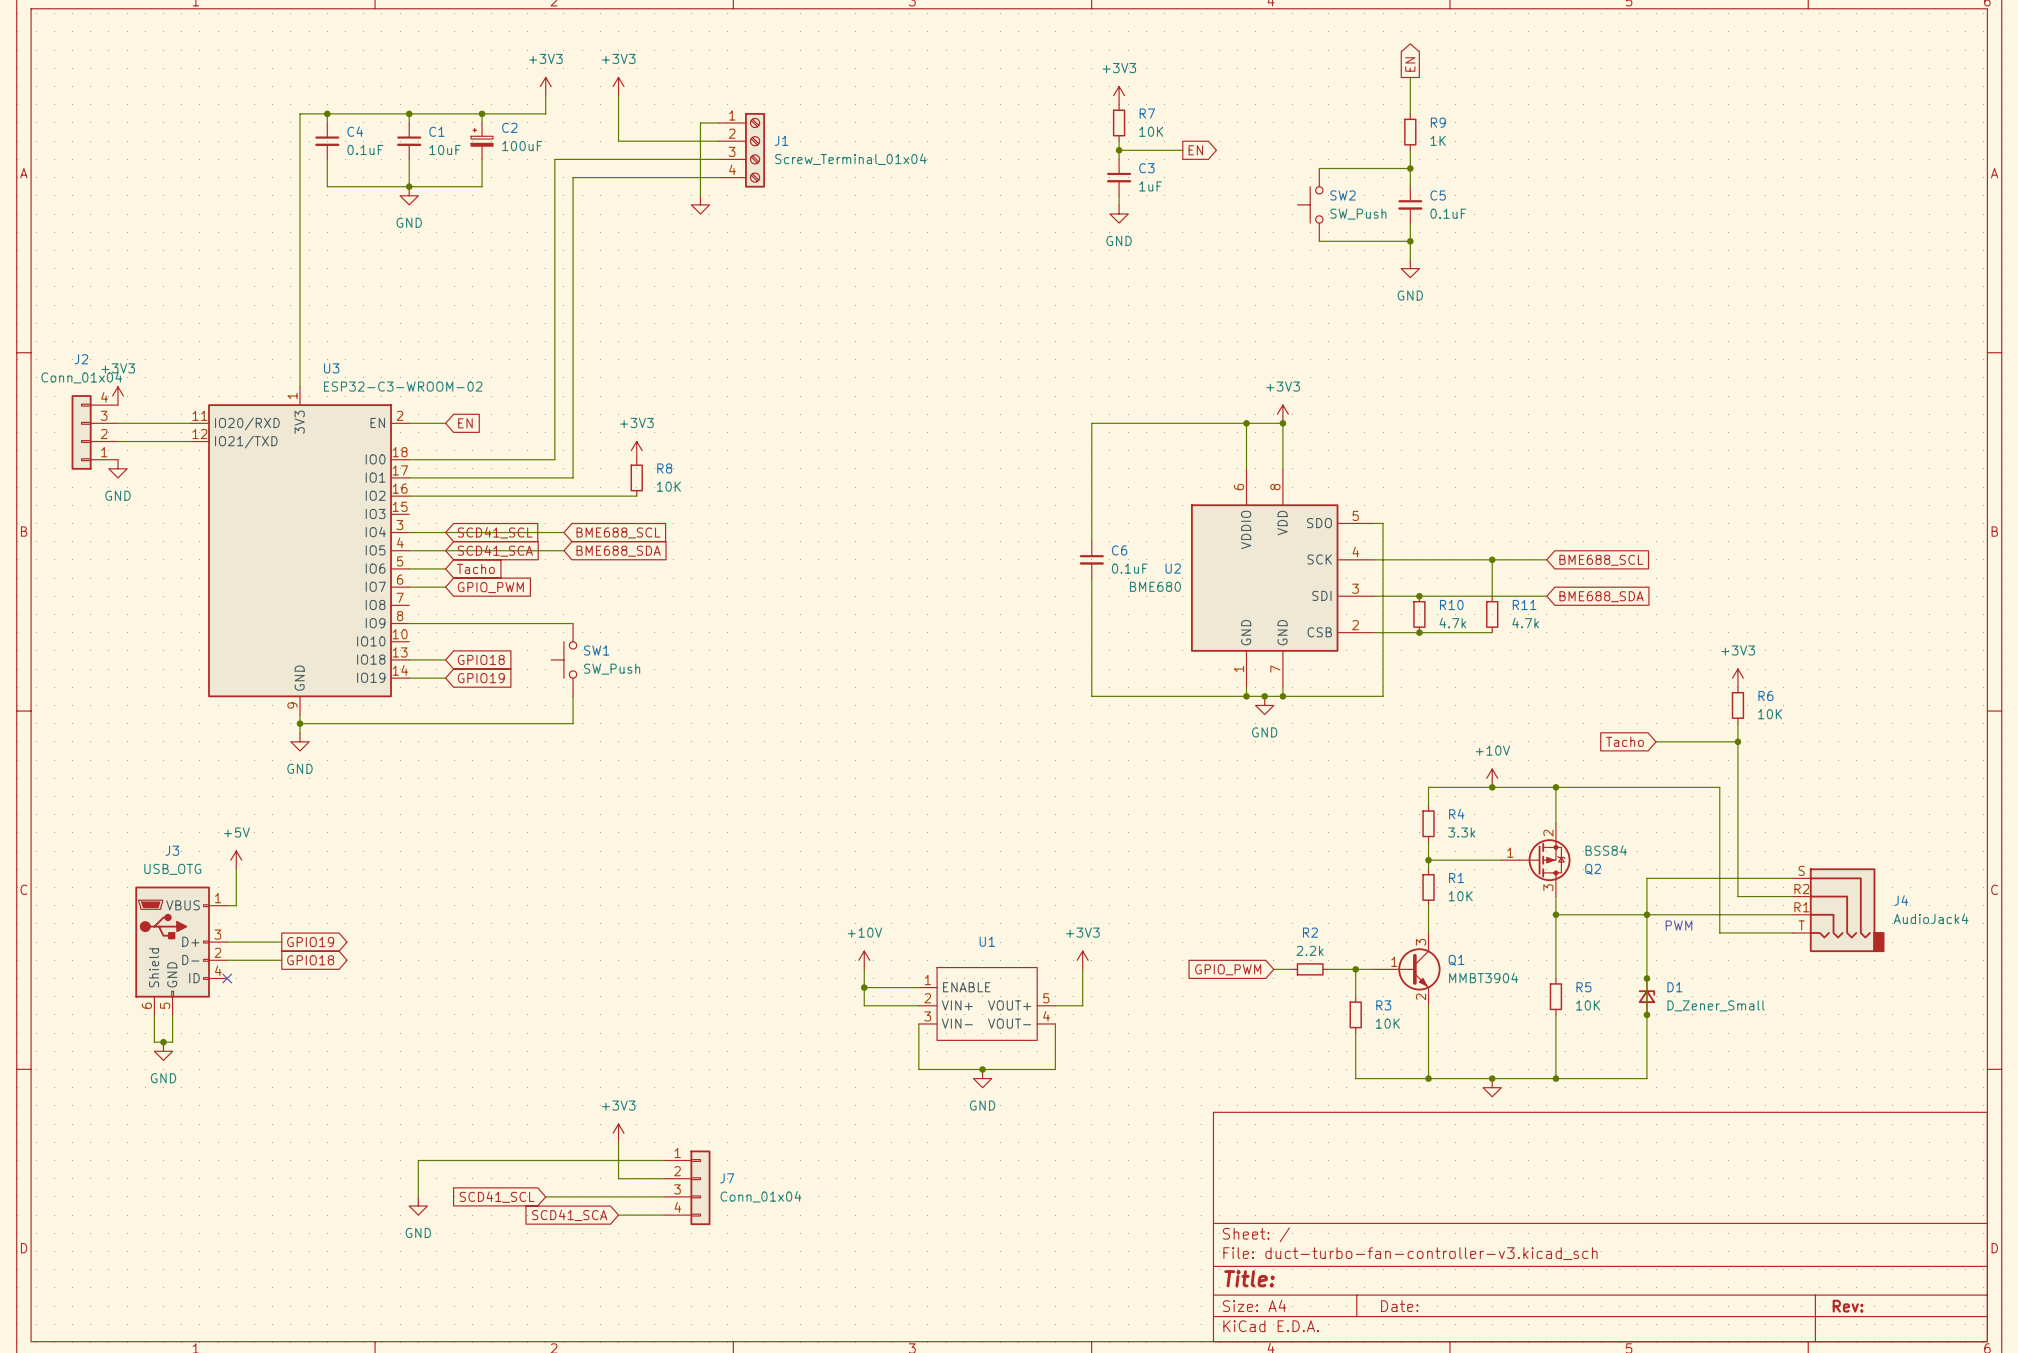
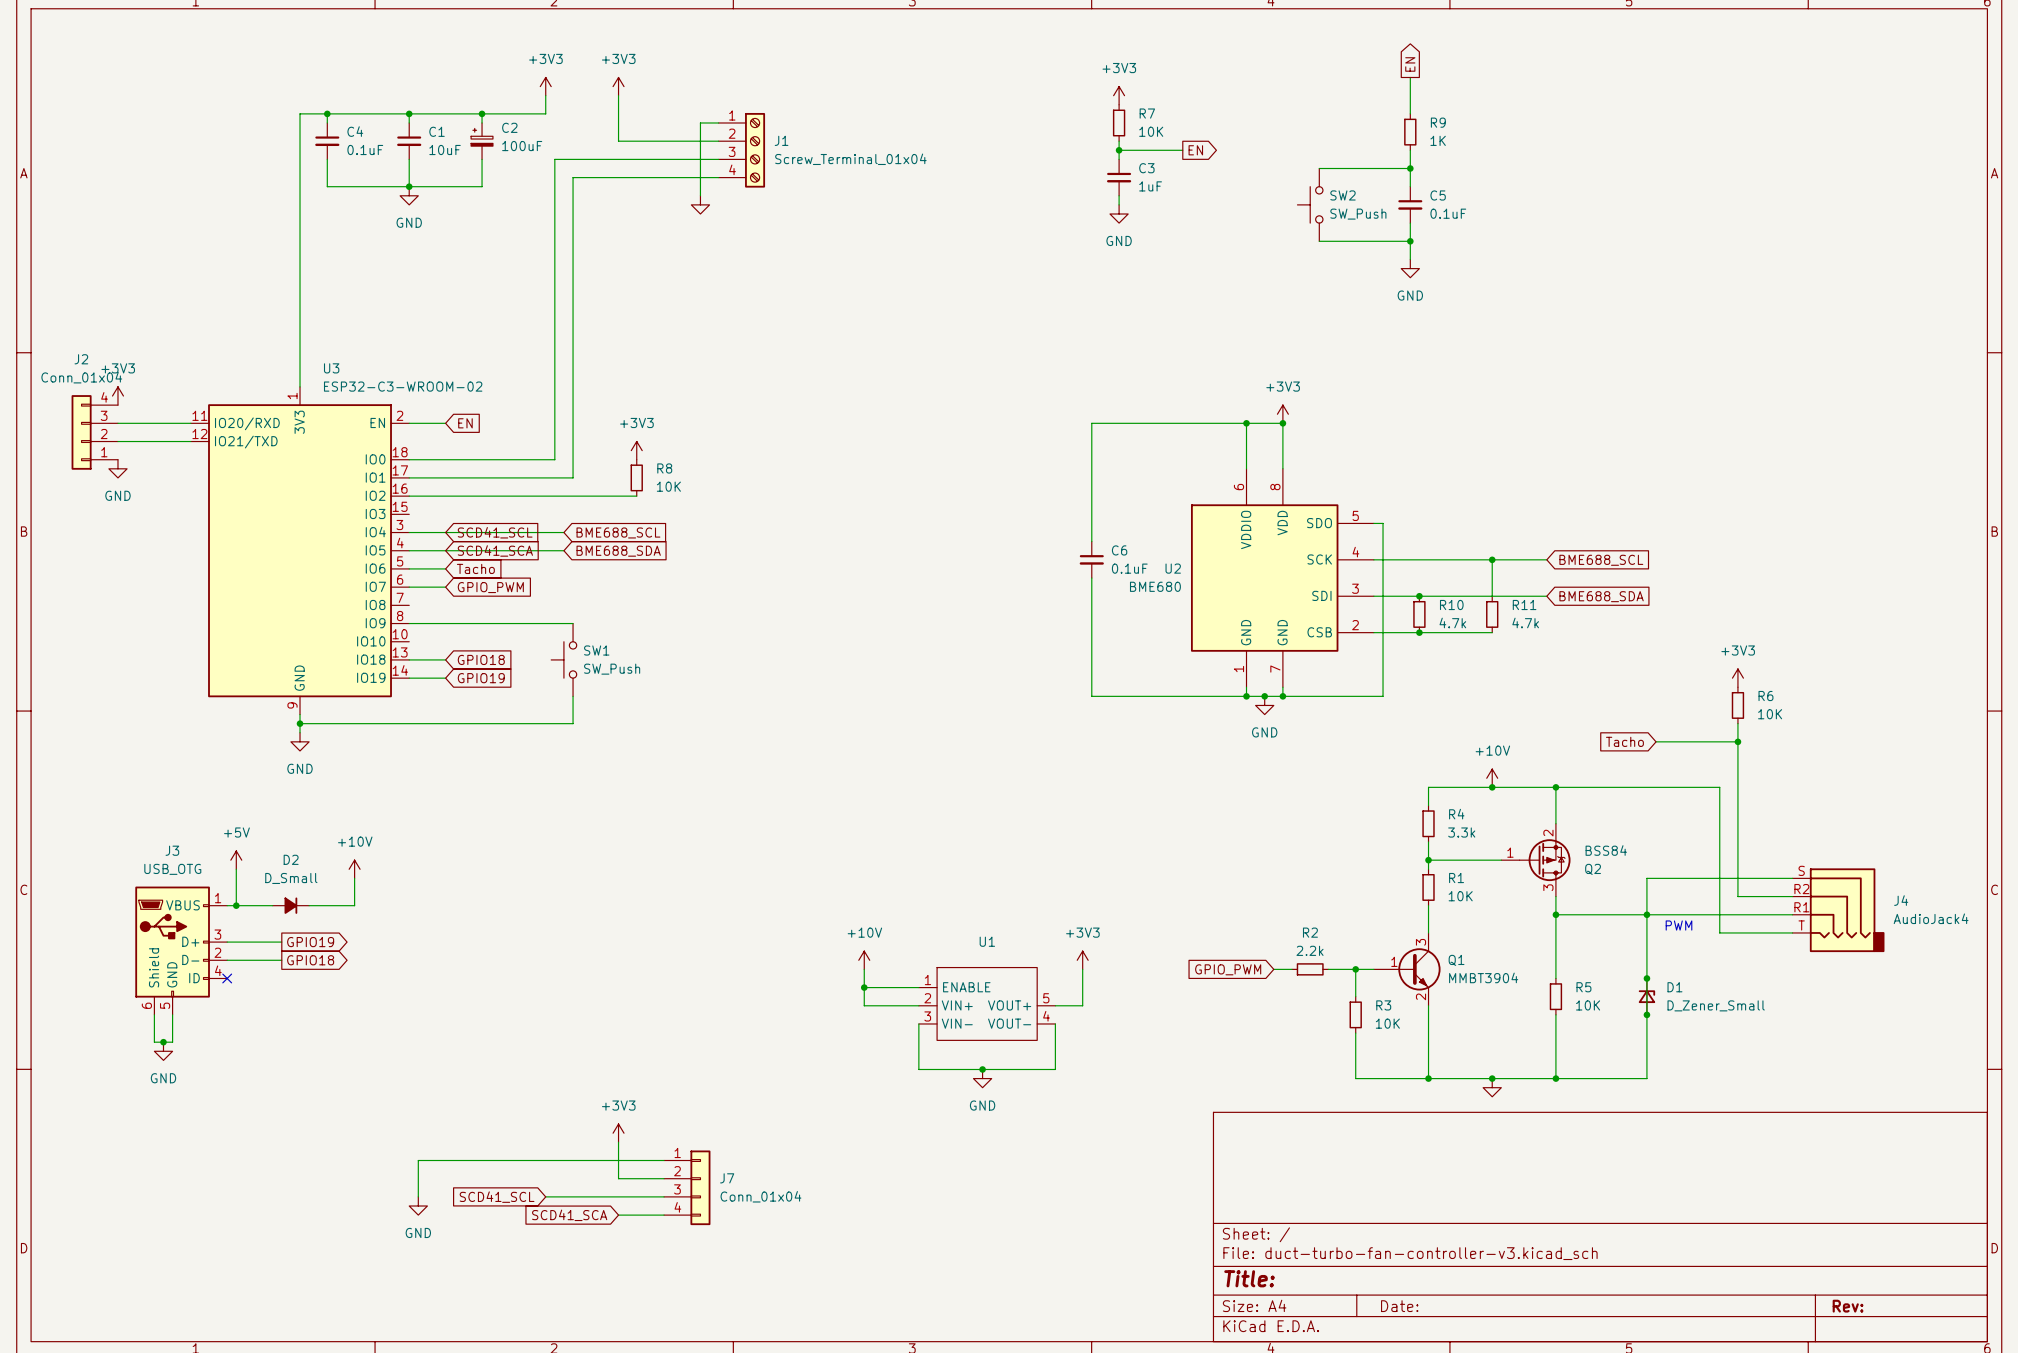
power symbol: none -> +10V (354, 869)
wire: none -> (354, 878) (354, 905) (309, 905)
wire: none -> (236, 905) (272, 905)
junction: none -> (236, 905)
D2: none -> D_Small (290, 905)

